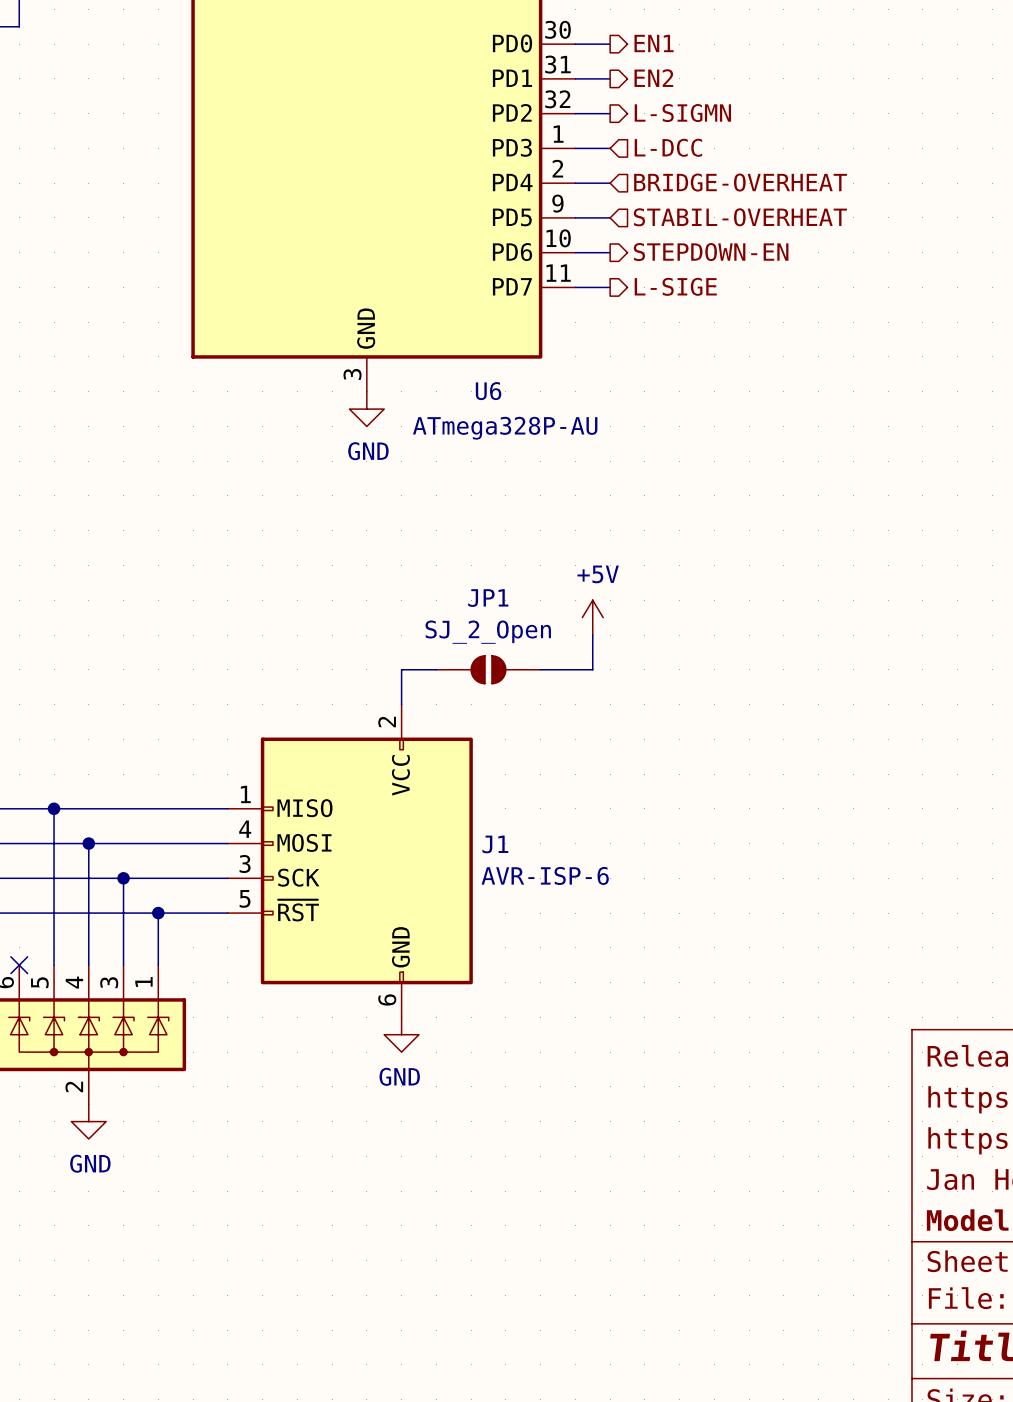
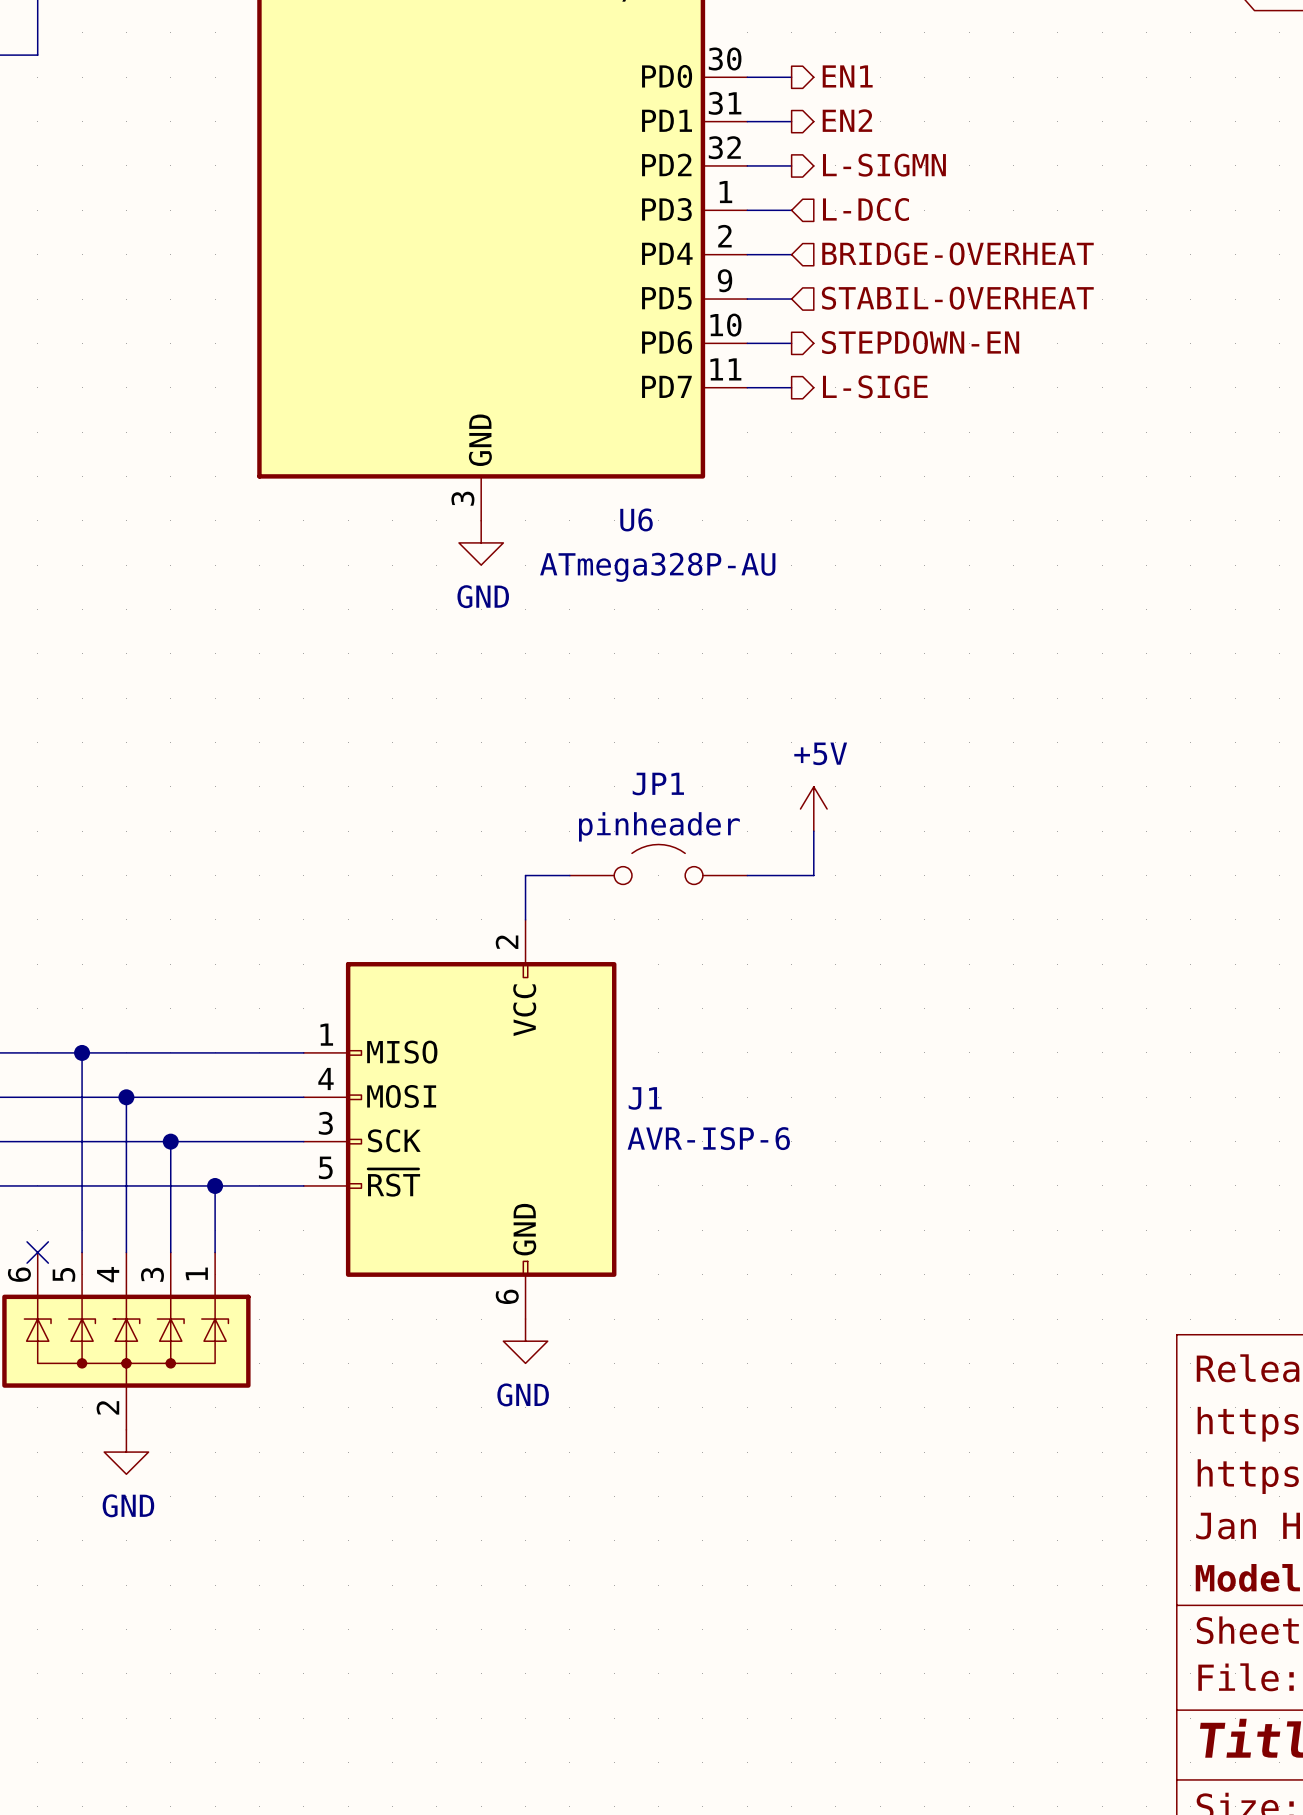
power symbol position: +5V (592, 617) -> +5V (813, 809)
JP1 value: SJ_2_Open (488, 632) -> pinheader (659, 826)
wire: (592, 635) (592, 669) -> (813, 831) (813, 875) (769, 875)
JP1 symbol: [436, 655, 541, 684] -> [569, 844, 748, 885]

